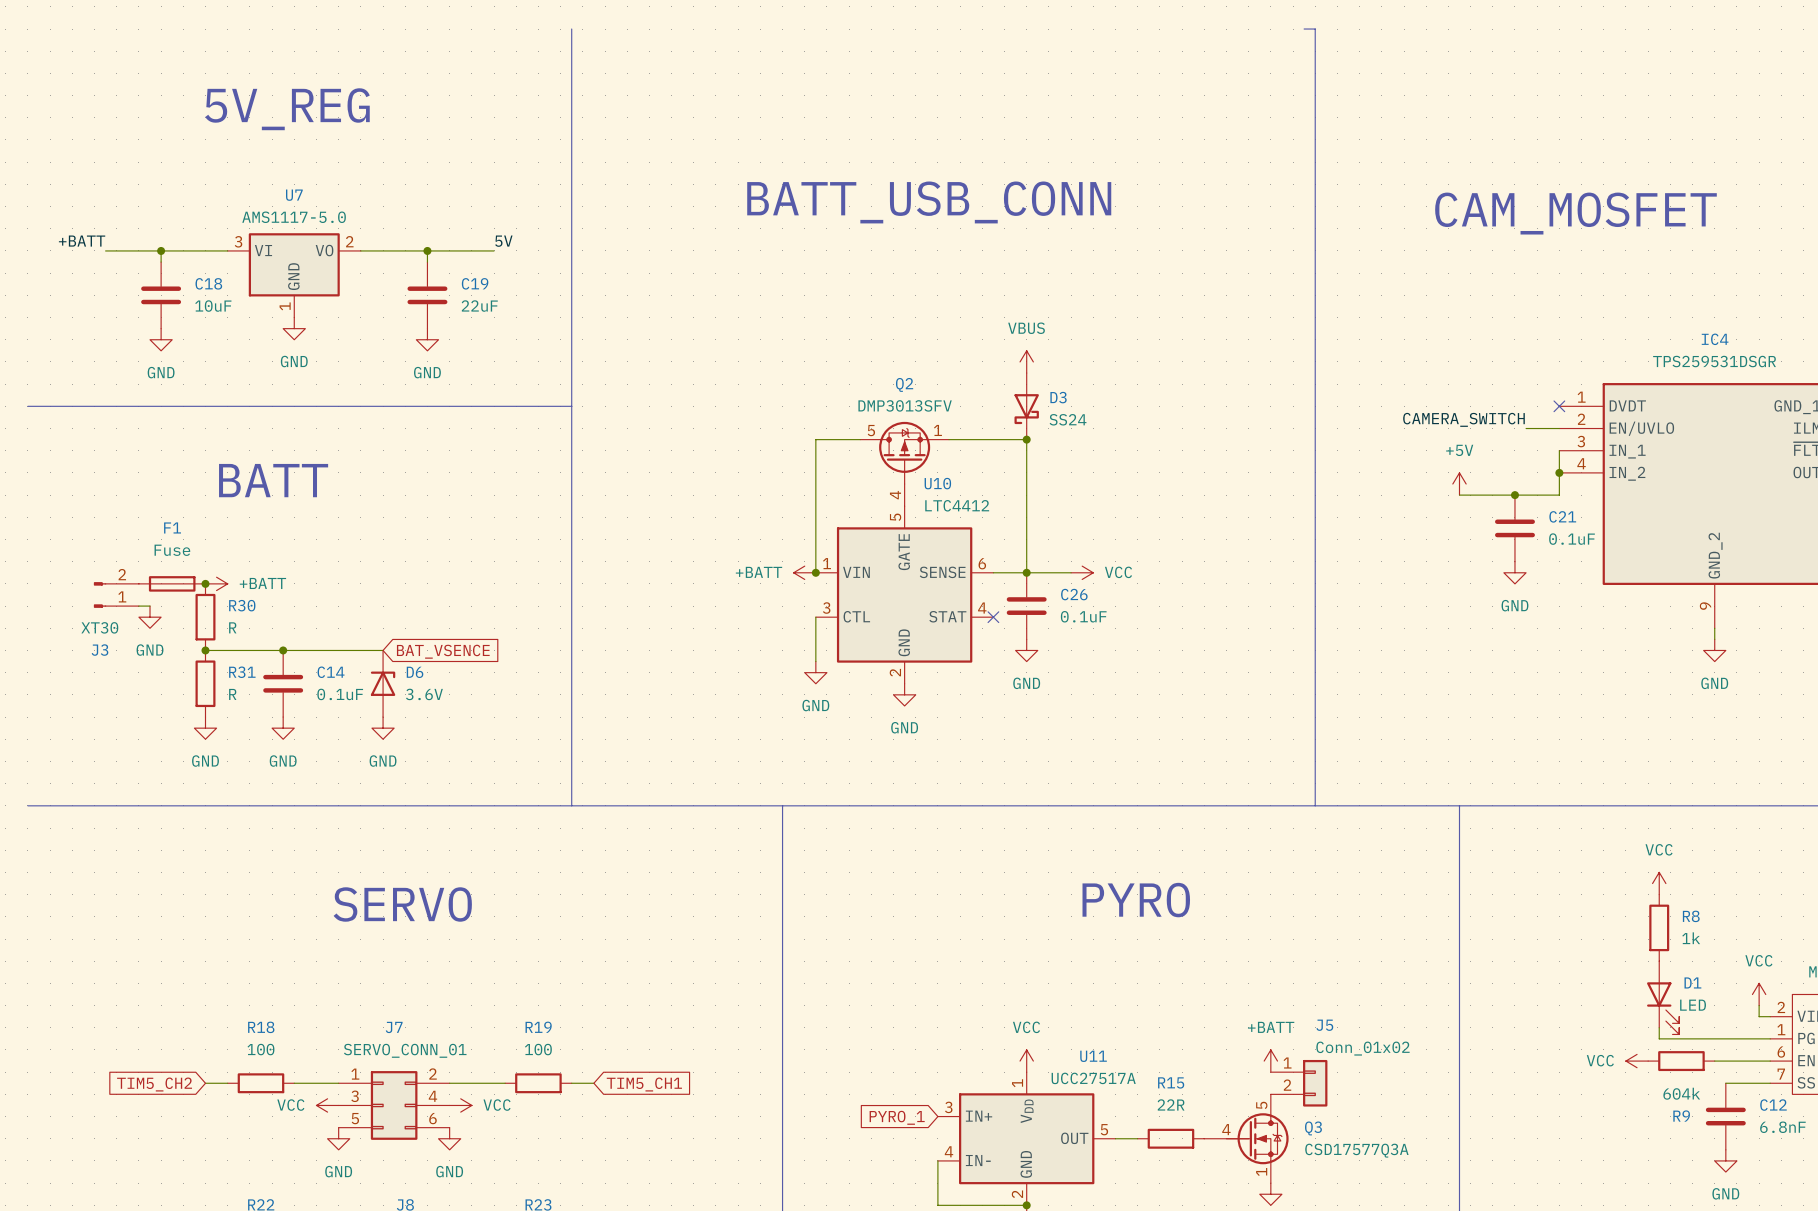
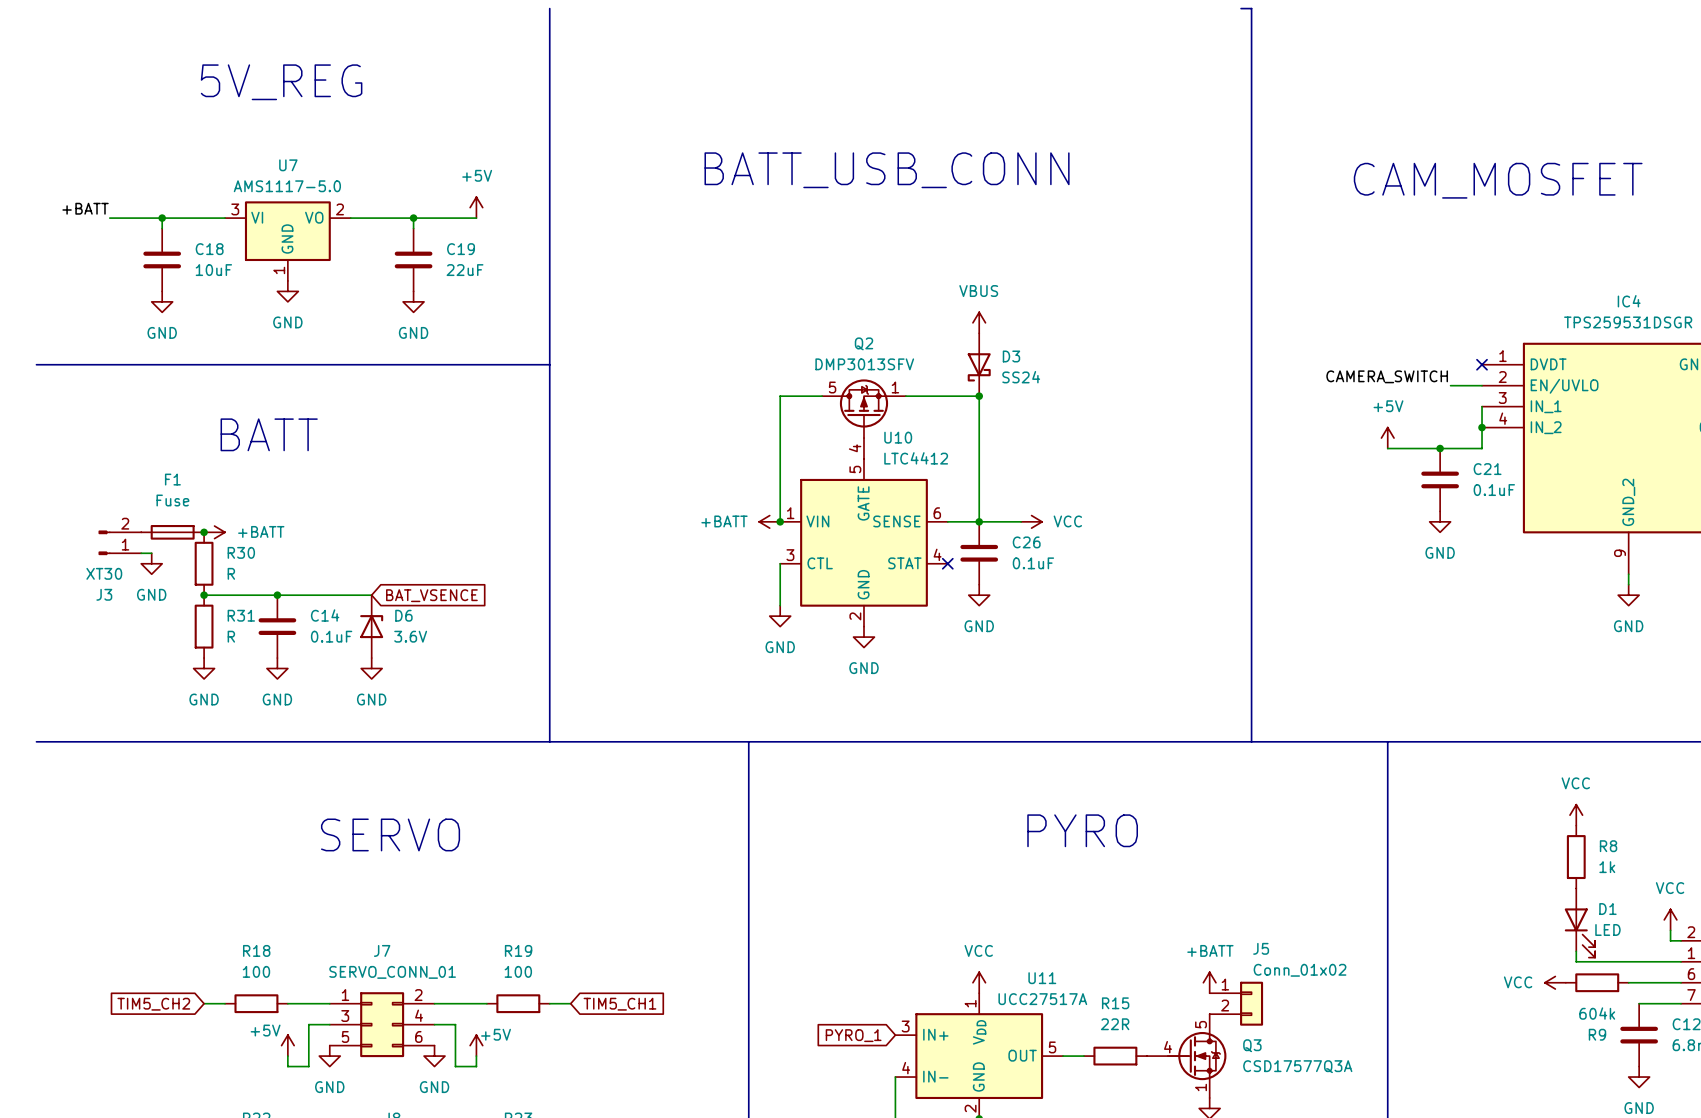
power symbol: none -> +5V (476, 207)
label: 5V (503, 241) -> none
power symbol: VCC (327, 1105) -> none
wire: none -> (329, 1024) (308, 1024) (308, 1066) (287, 1066) (287, 1056)
wire: none -> (434, 1024) (455, 1024) (455, 1066) (476, 1066) (476, 1056)
power symbol: VCC (460, 1105) -> none
power symbol: none -> +5V (287, 1045)
power symbol: none -> +5V (476, 1045)

